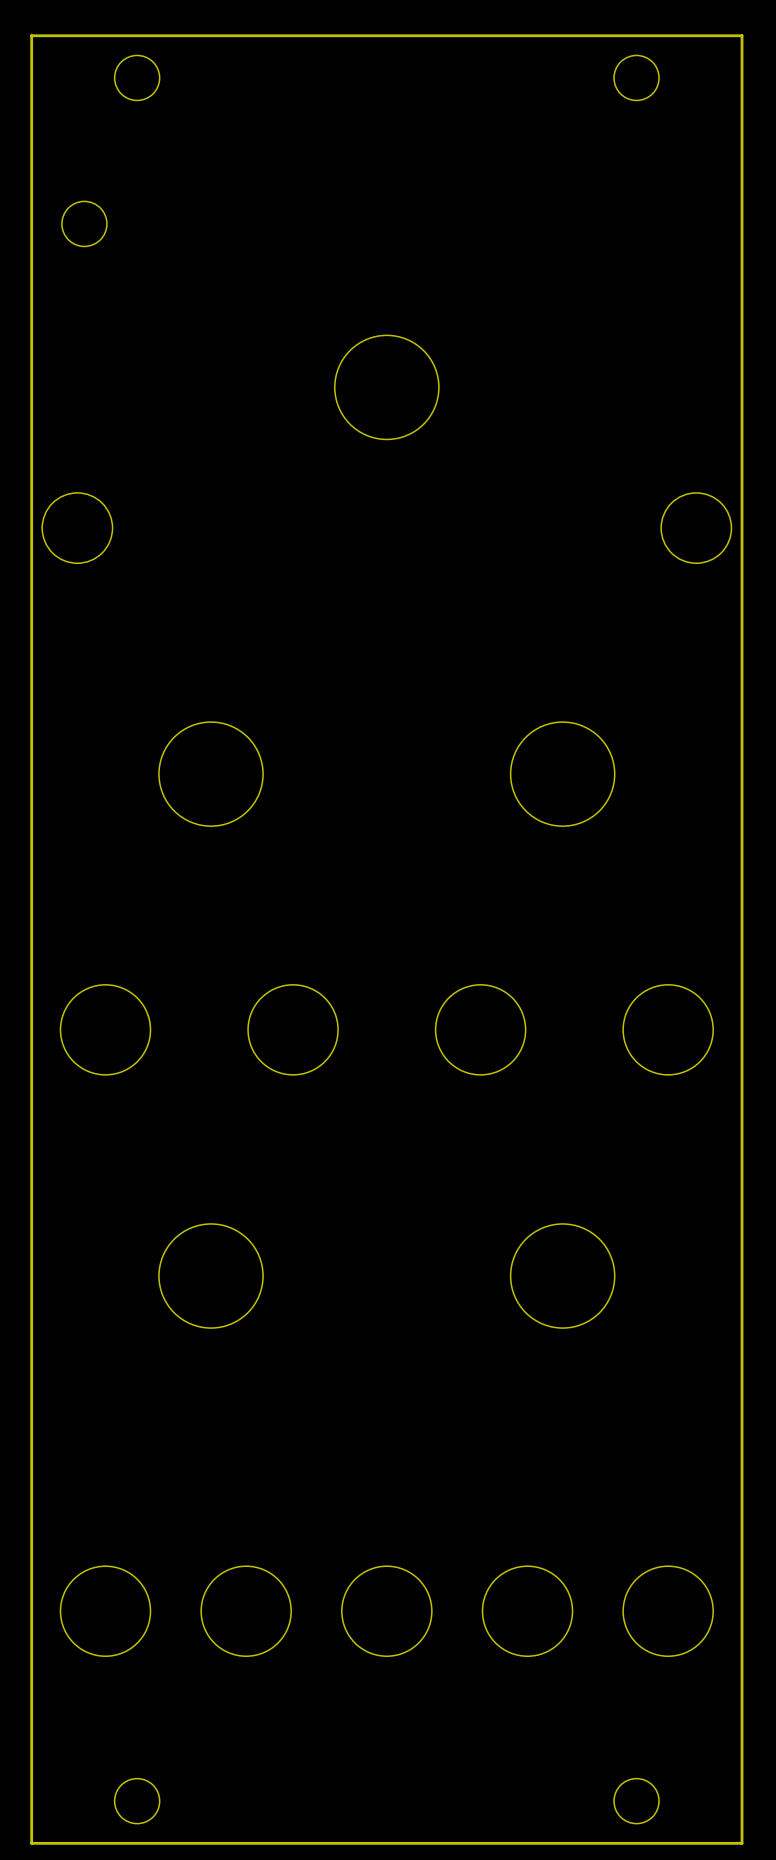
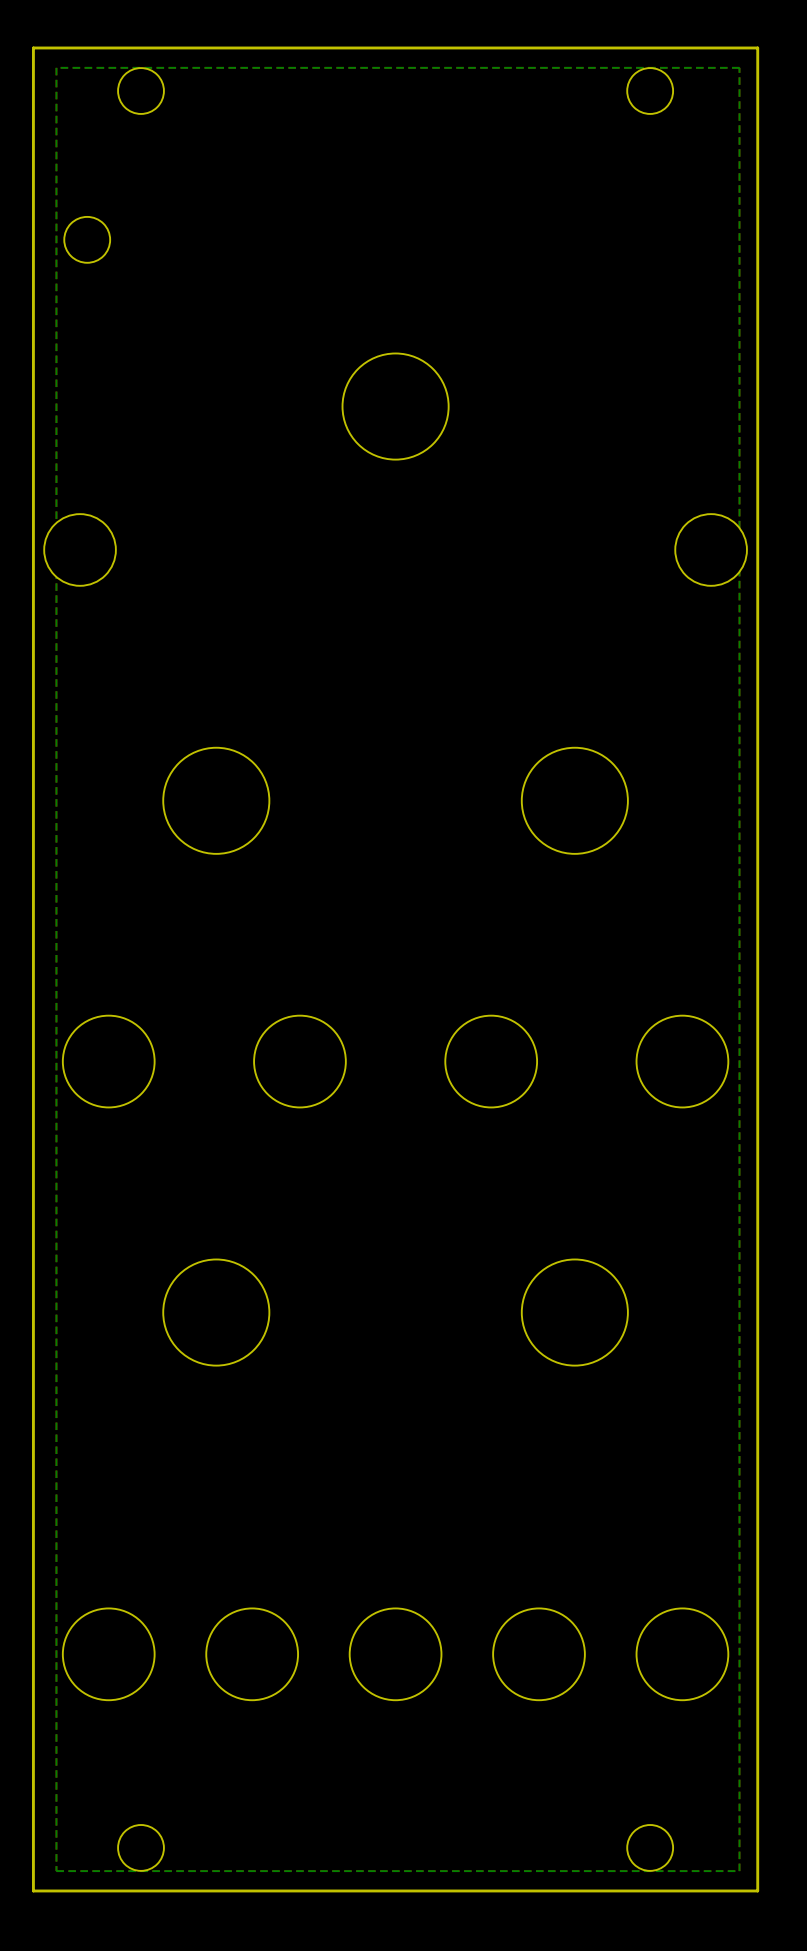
bottom zone outline: none -> (739, 67) (739, 1871) (56, 1871) (56, 67) (739, 67)

